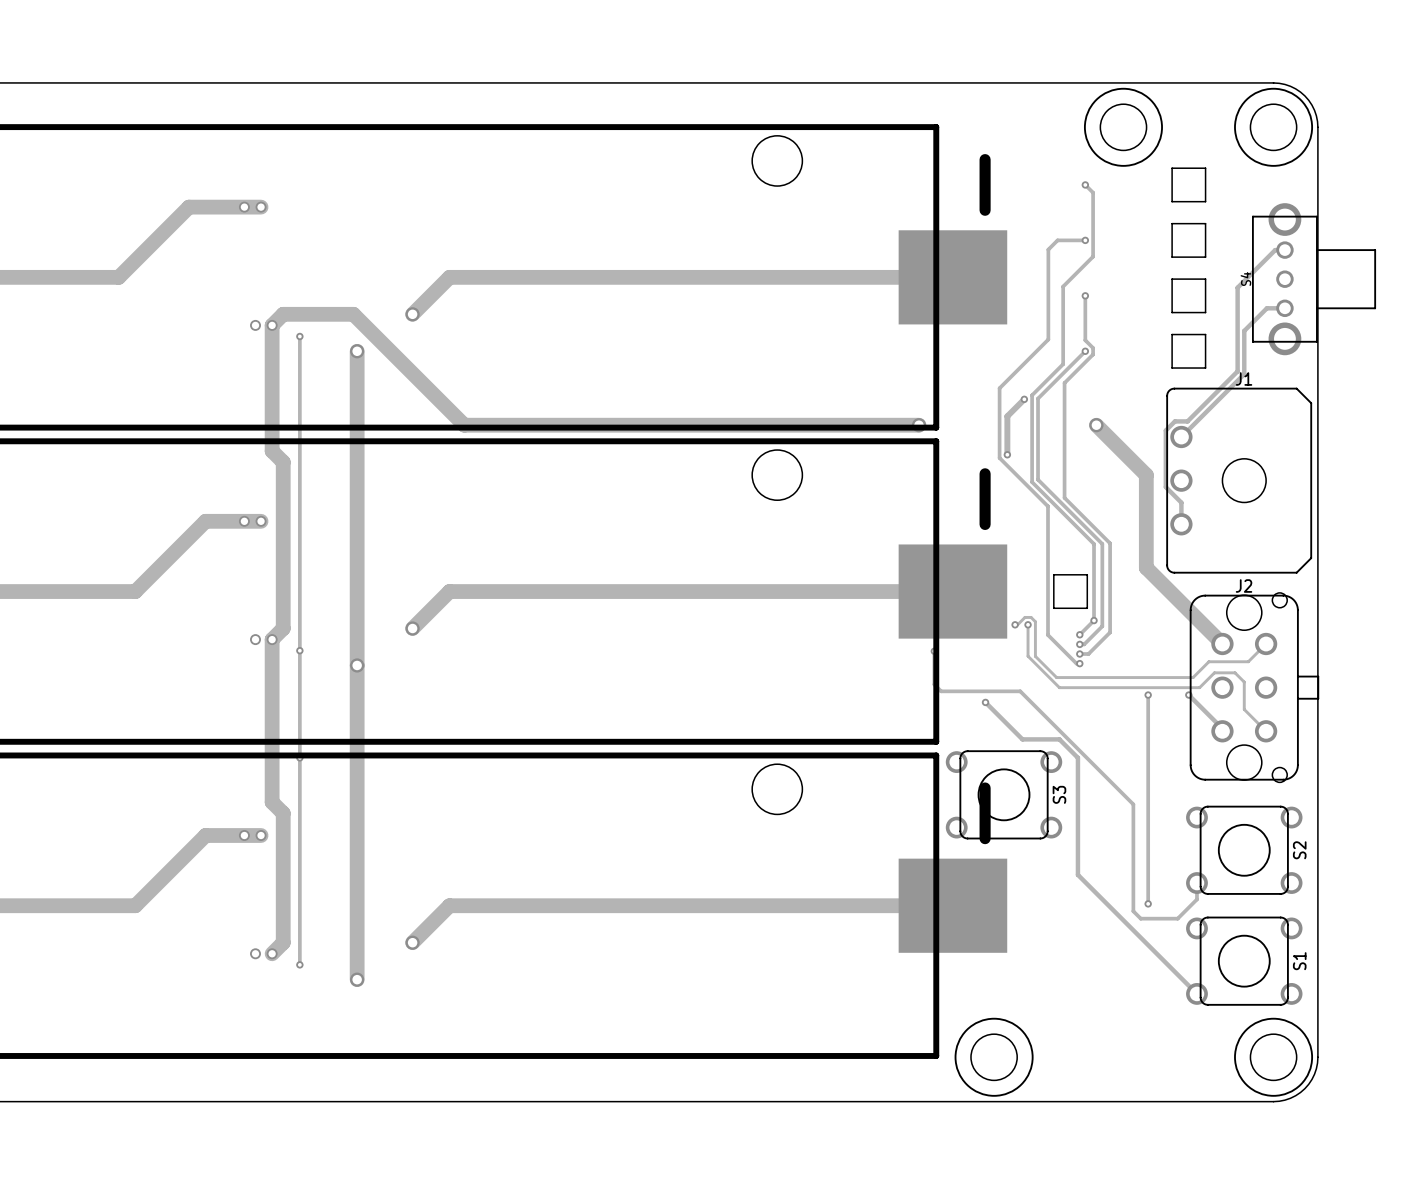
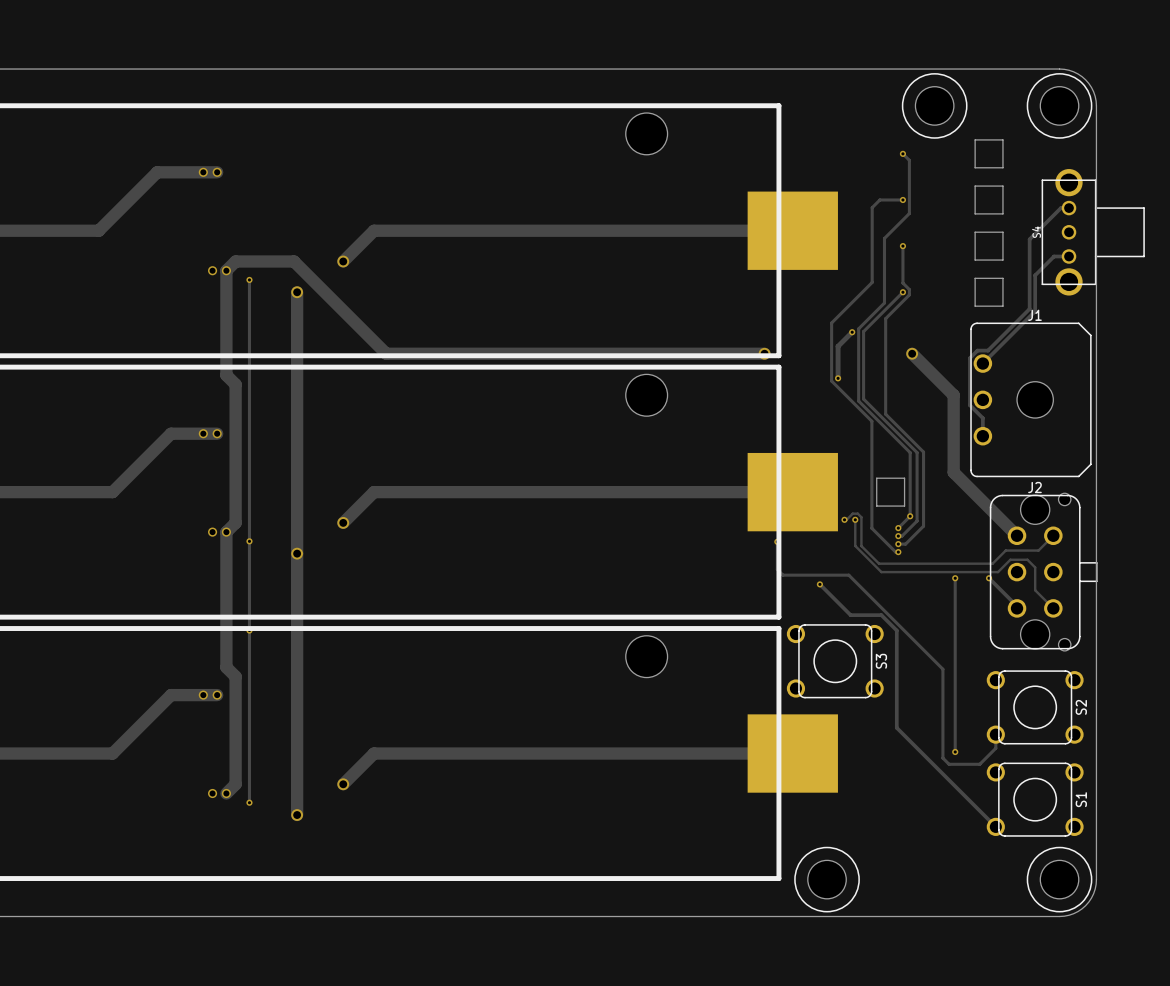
part text: - (985, 184) -> none
part text: - (985, 499) -> none
part text: - (985, 813) -> none

